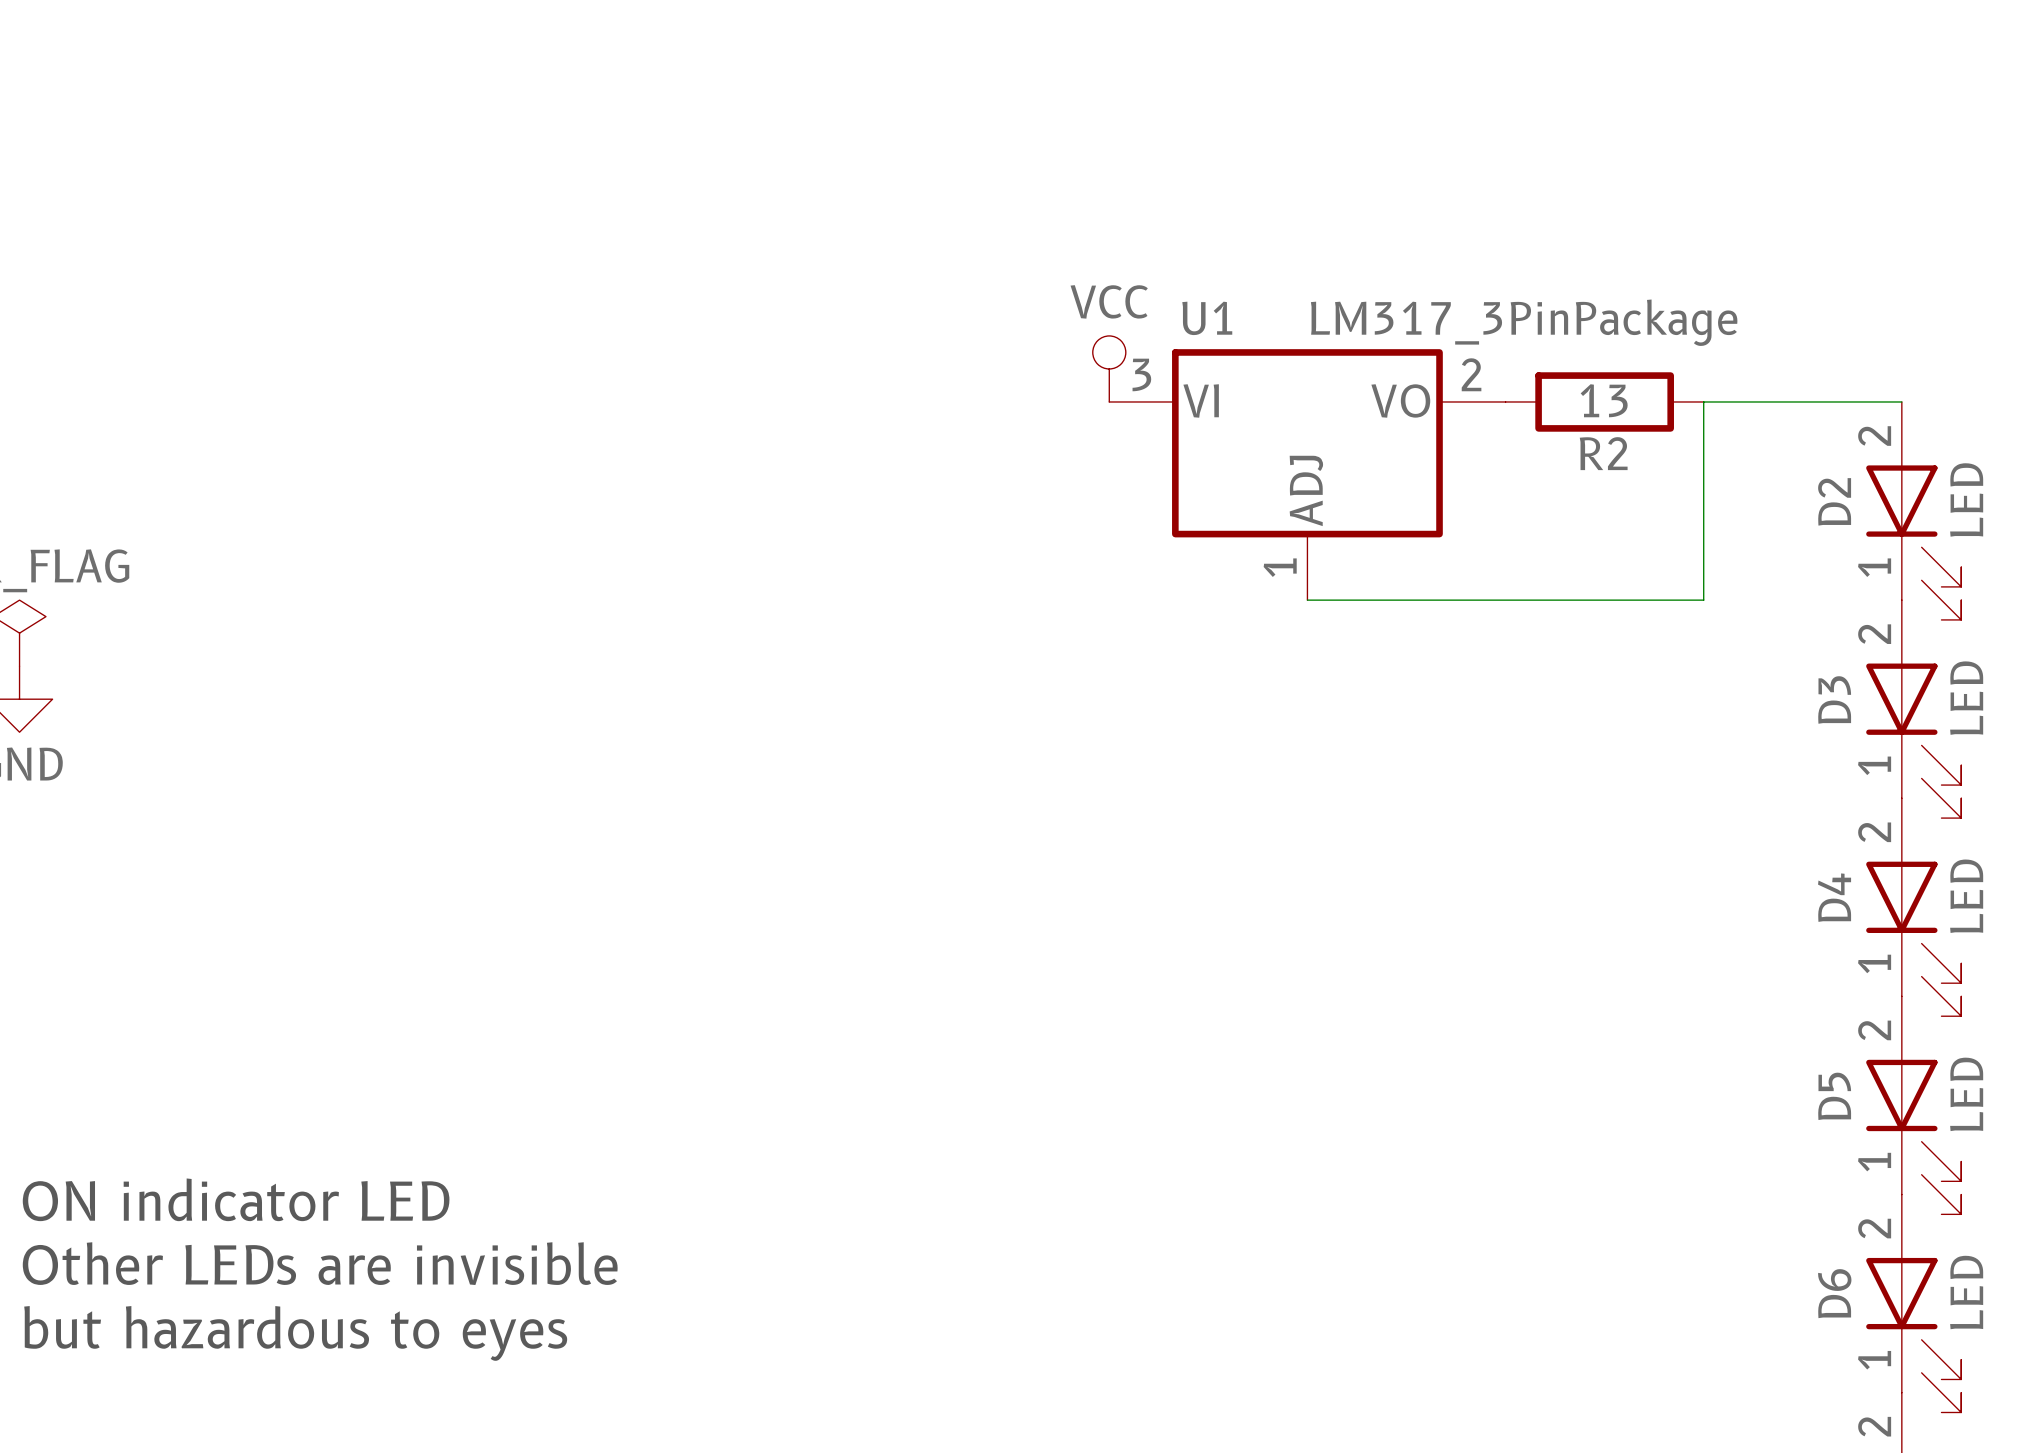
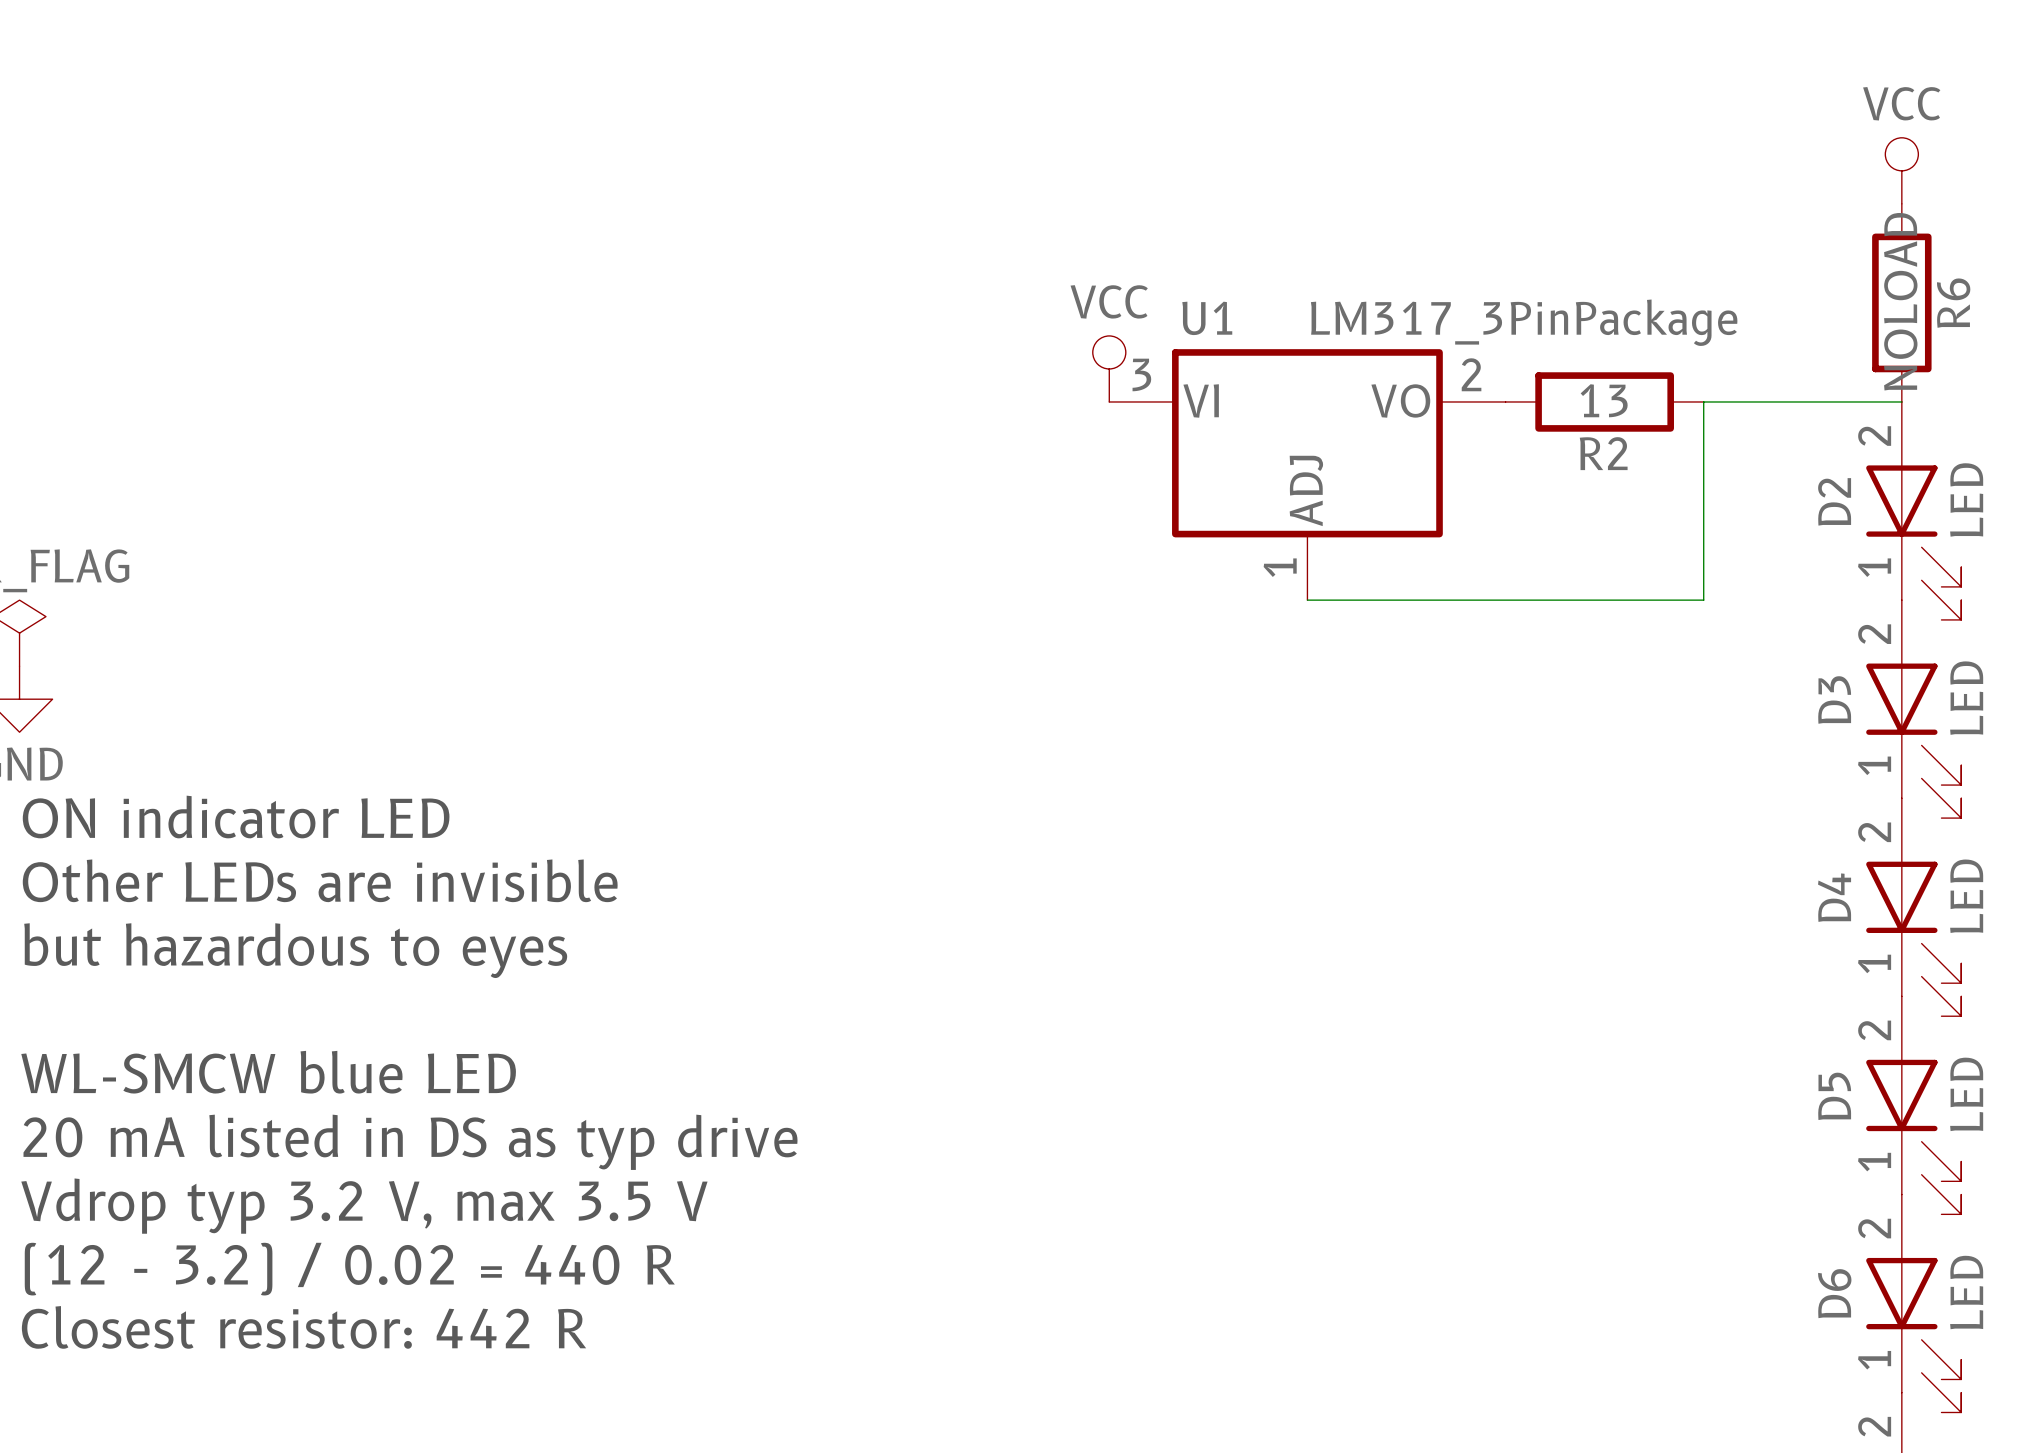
power symbol: none -> VCC (1901, 170)
R6: none -> NOLOAD (1901, 302)
text: none -> ON indicator LED (236, 817)
text: none -> Other LEDs are invisible (320, 880)
text: none -> but hazardous to eyes (295, 950)
text: none -> WL-SMCW blue LED (268, 1072)
text: none -> 20 mA listed in DS as typ drive (410, 1142)
text: ON indicator LED (236, 1199) -> Vdrop typ 3.2 V, max 3.5 V (364, 1206)
text: Other LEDs are invisible (320, 1263) -> (12 - 3.2) / 0.02 = 440 R (349, 1269)
text: but hazardous to eyes (295, 1333) -> Closest resistor: 442 R (304, 1327)

